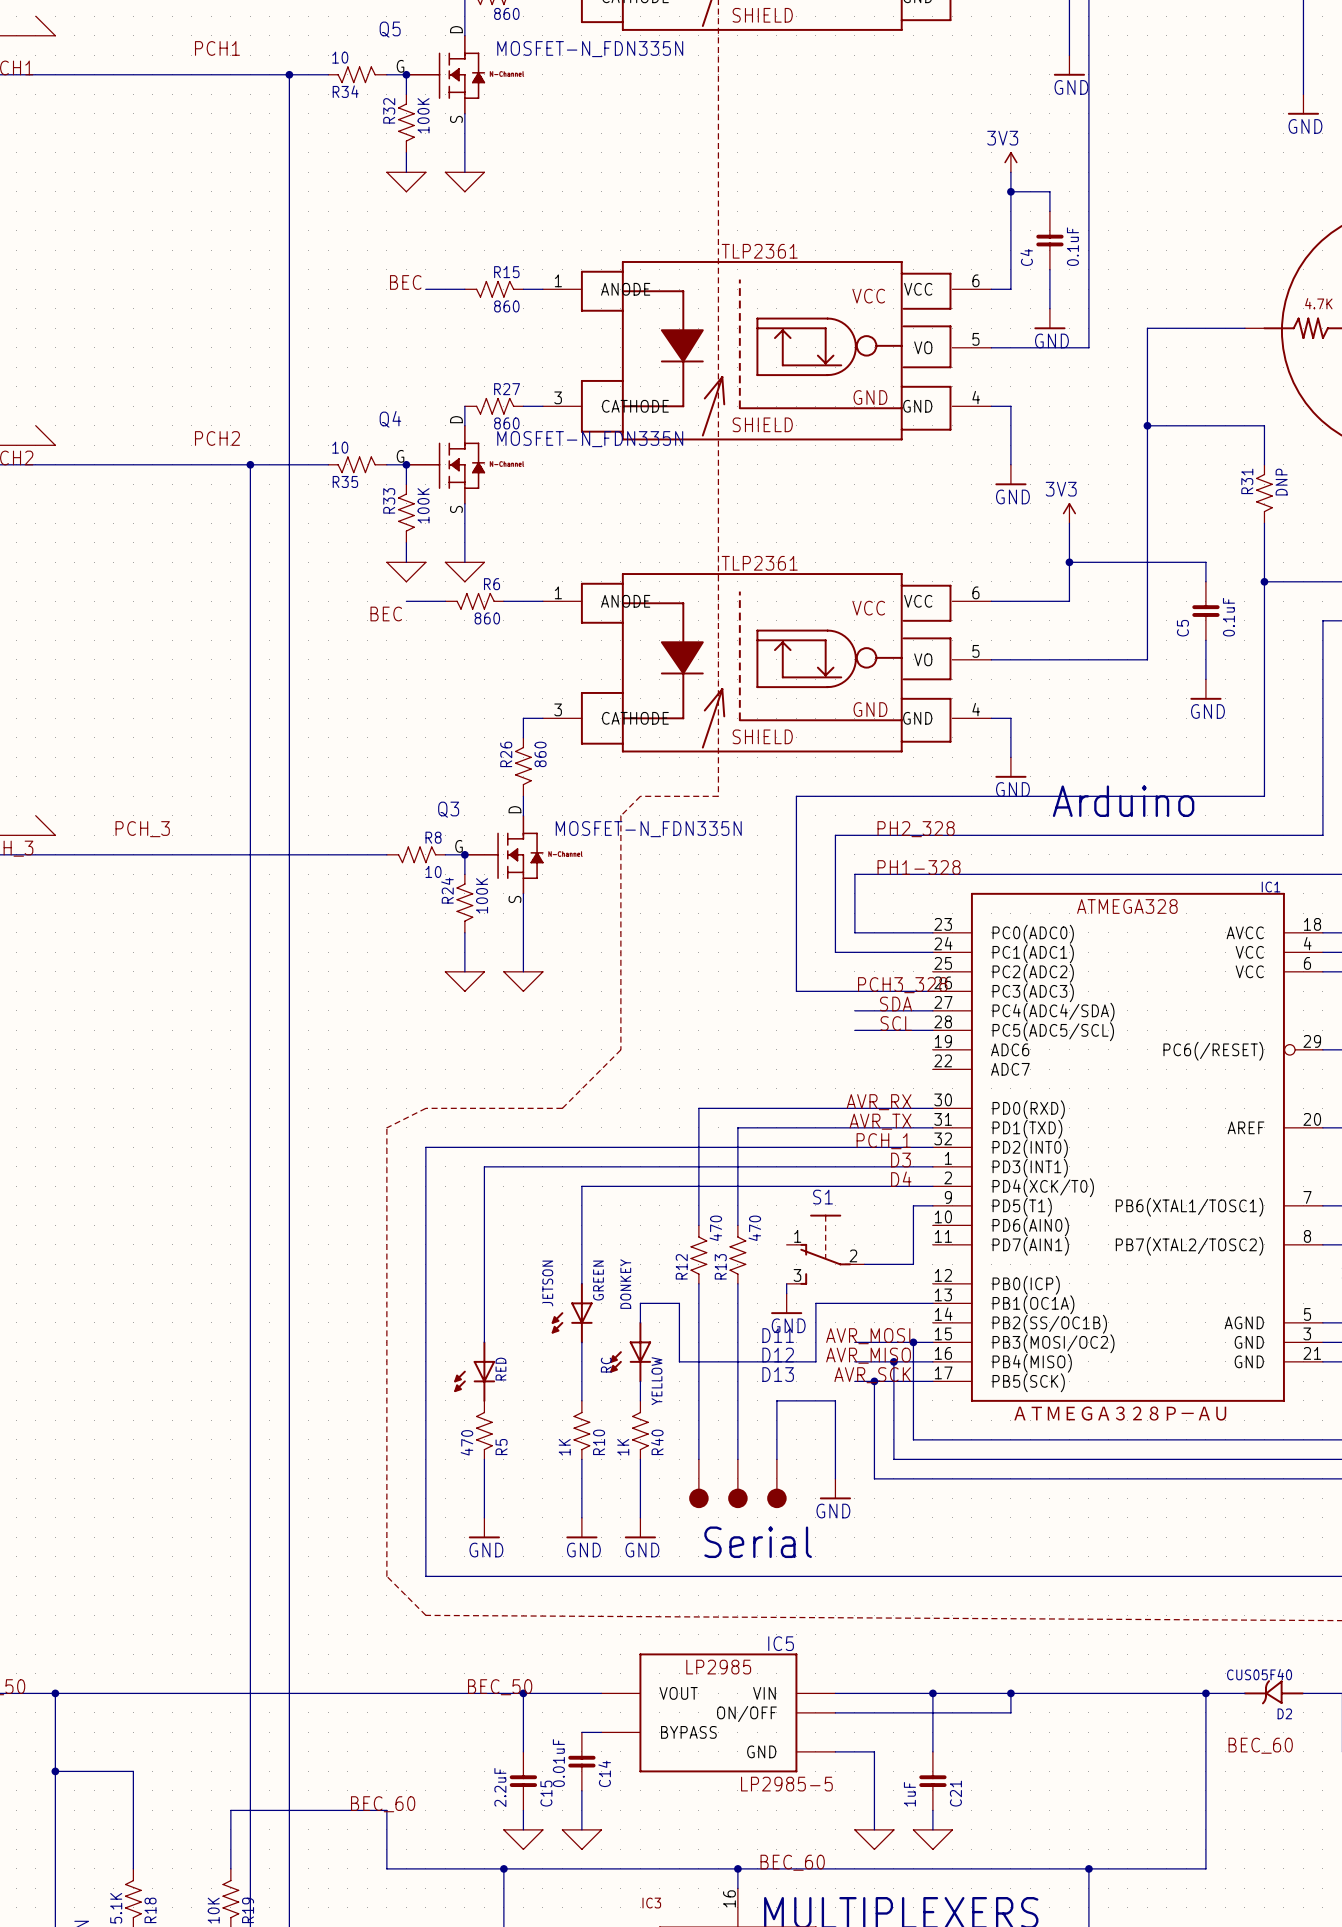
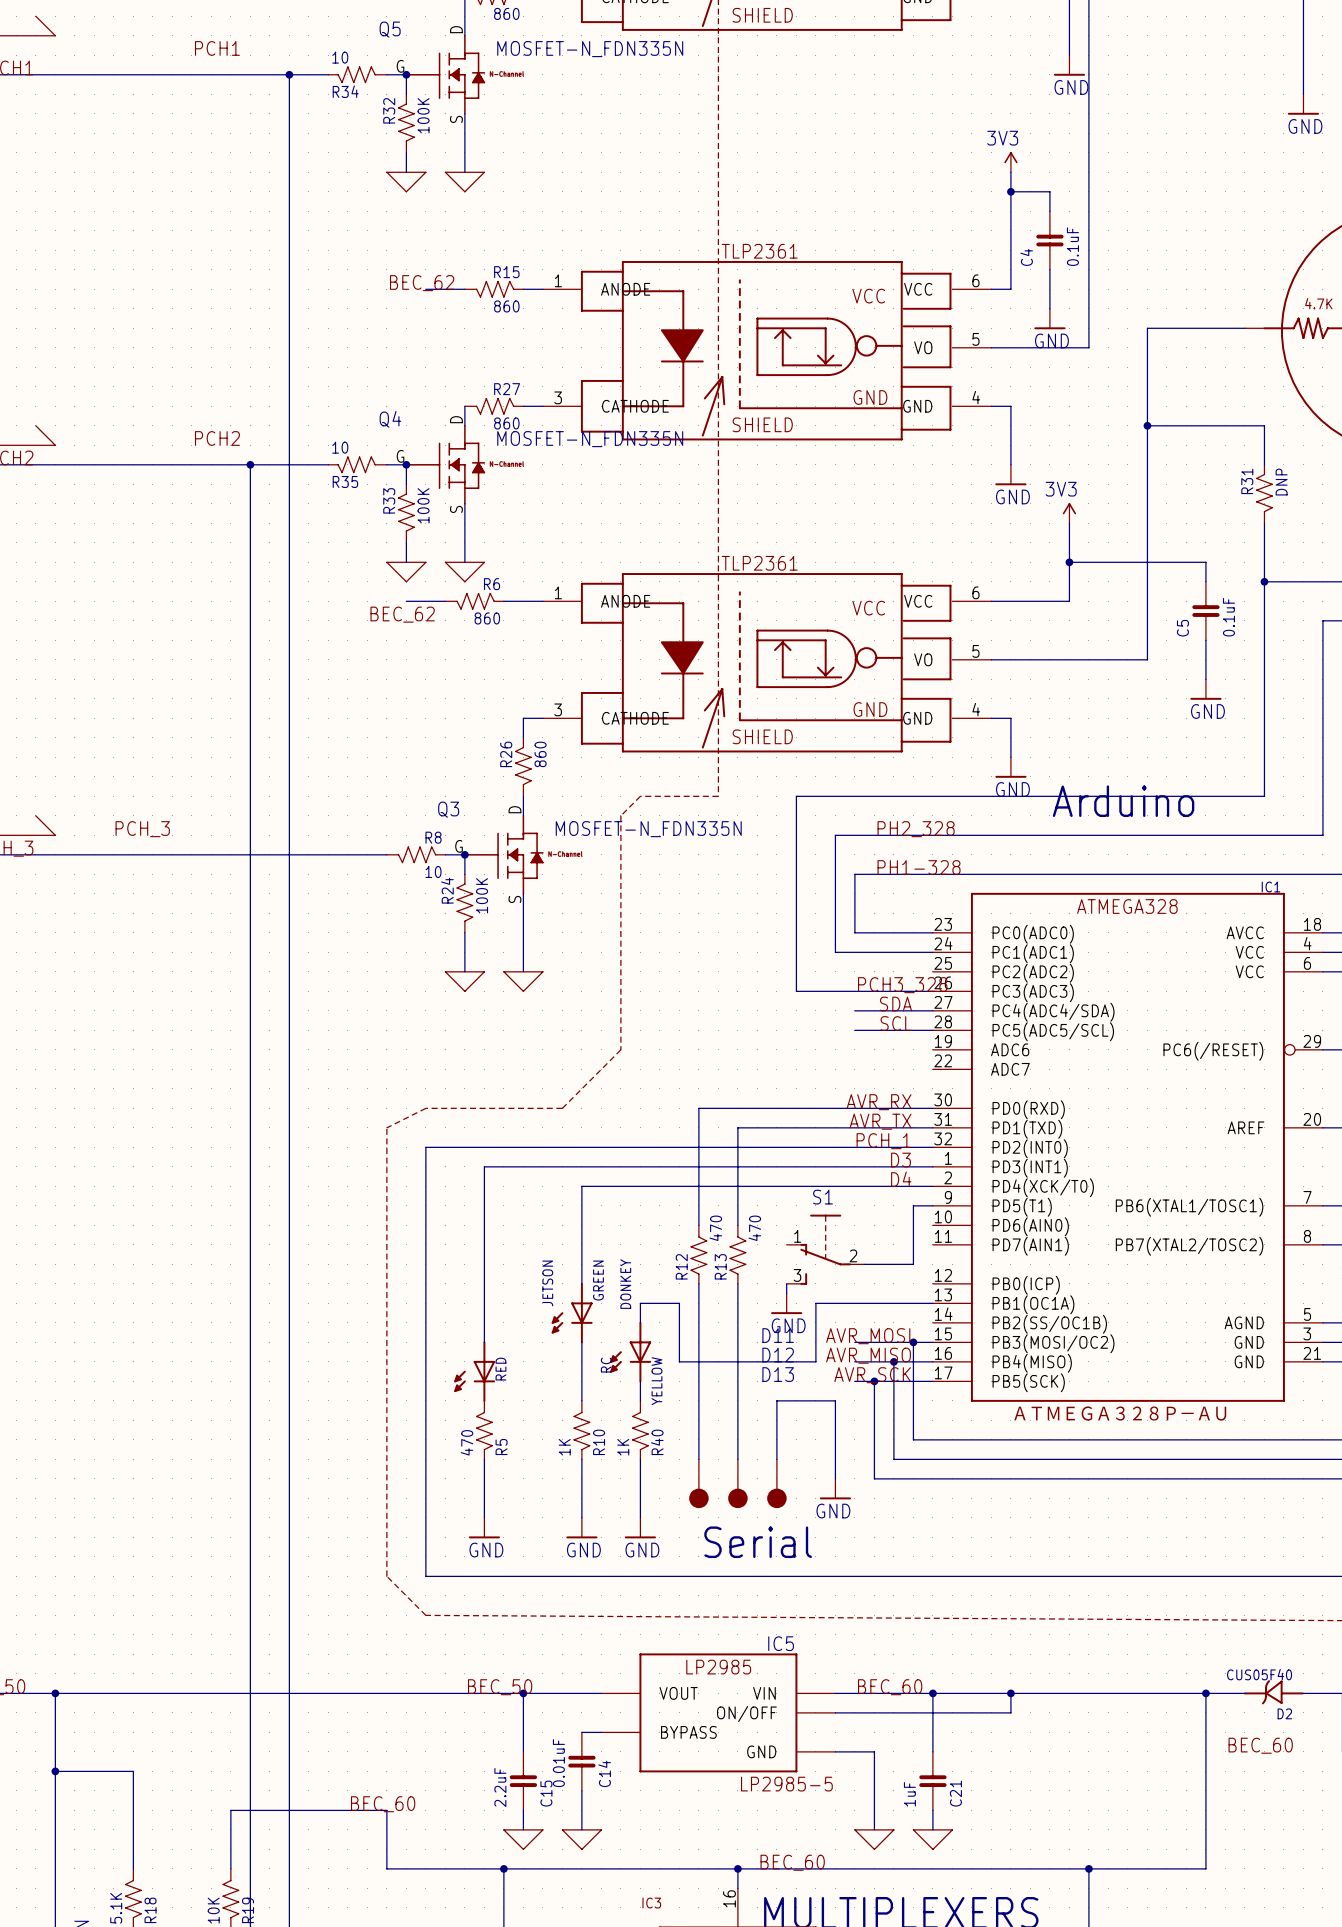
label: BEC (405, 282) -> BEC_62 (422, 283)
label: BEC (386, 613) -> BEC_62 (402, 614)
label: none -> BEC_60 (890, 1687)

